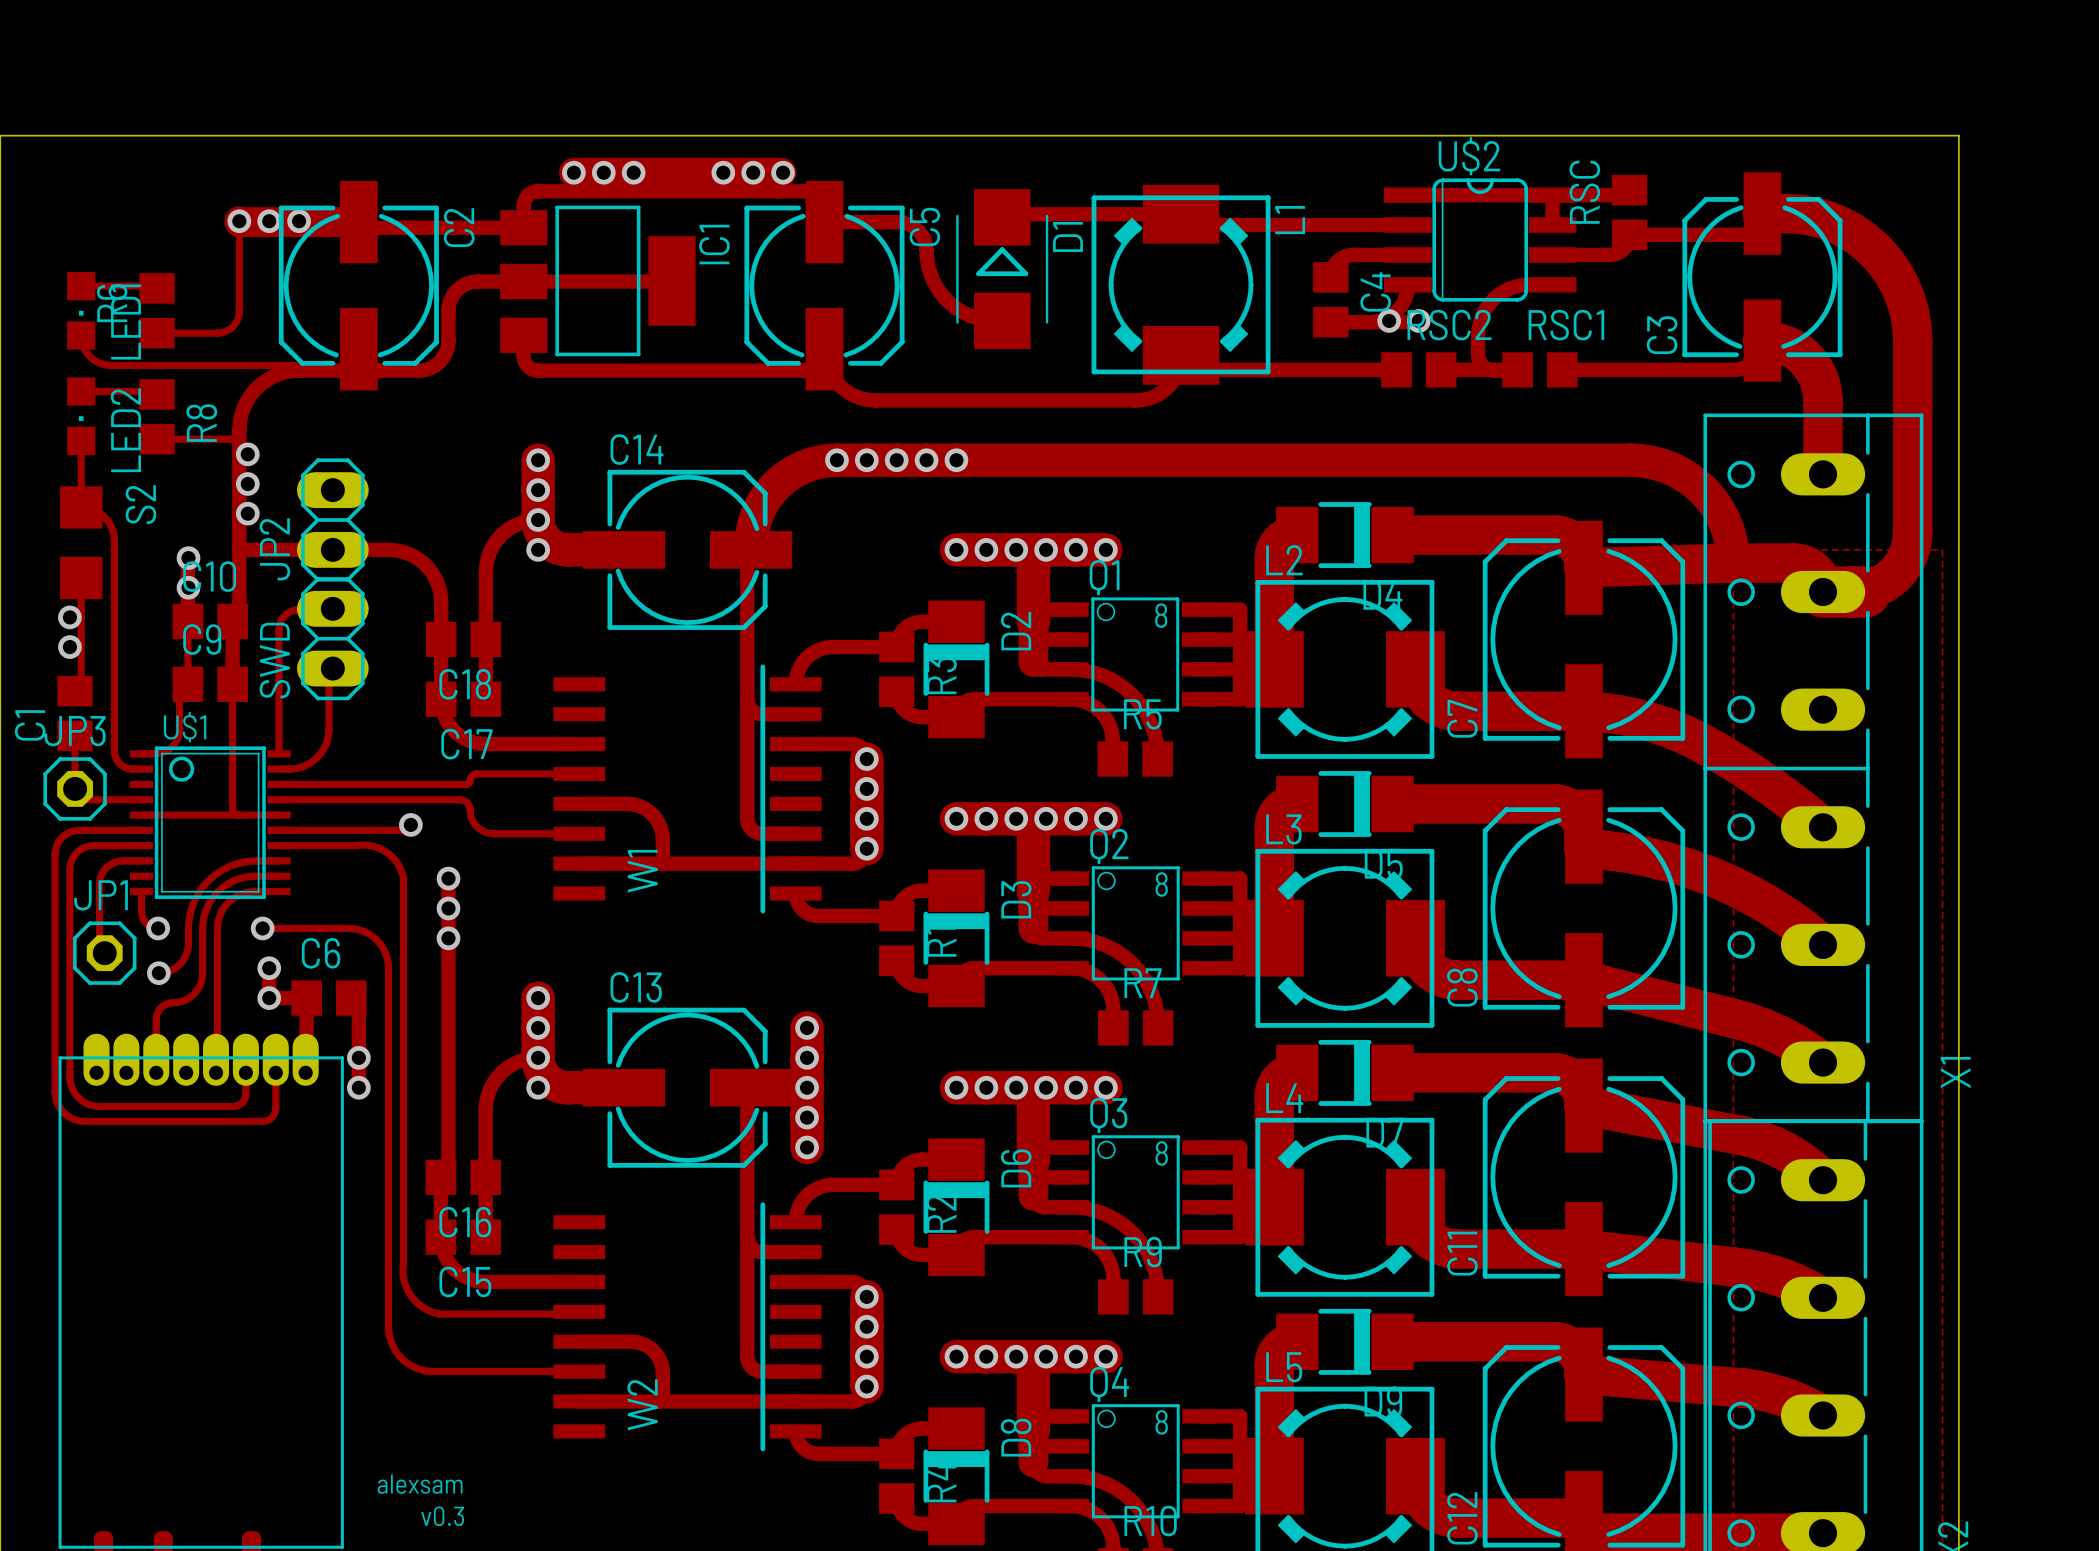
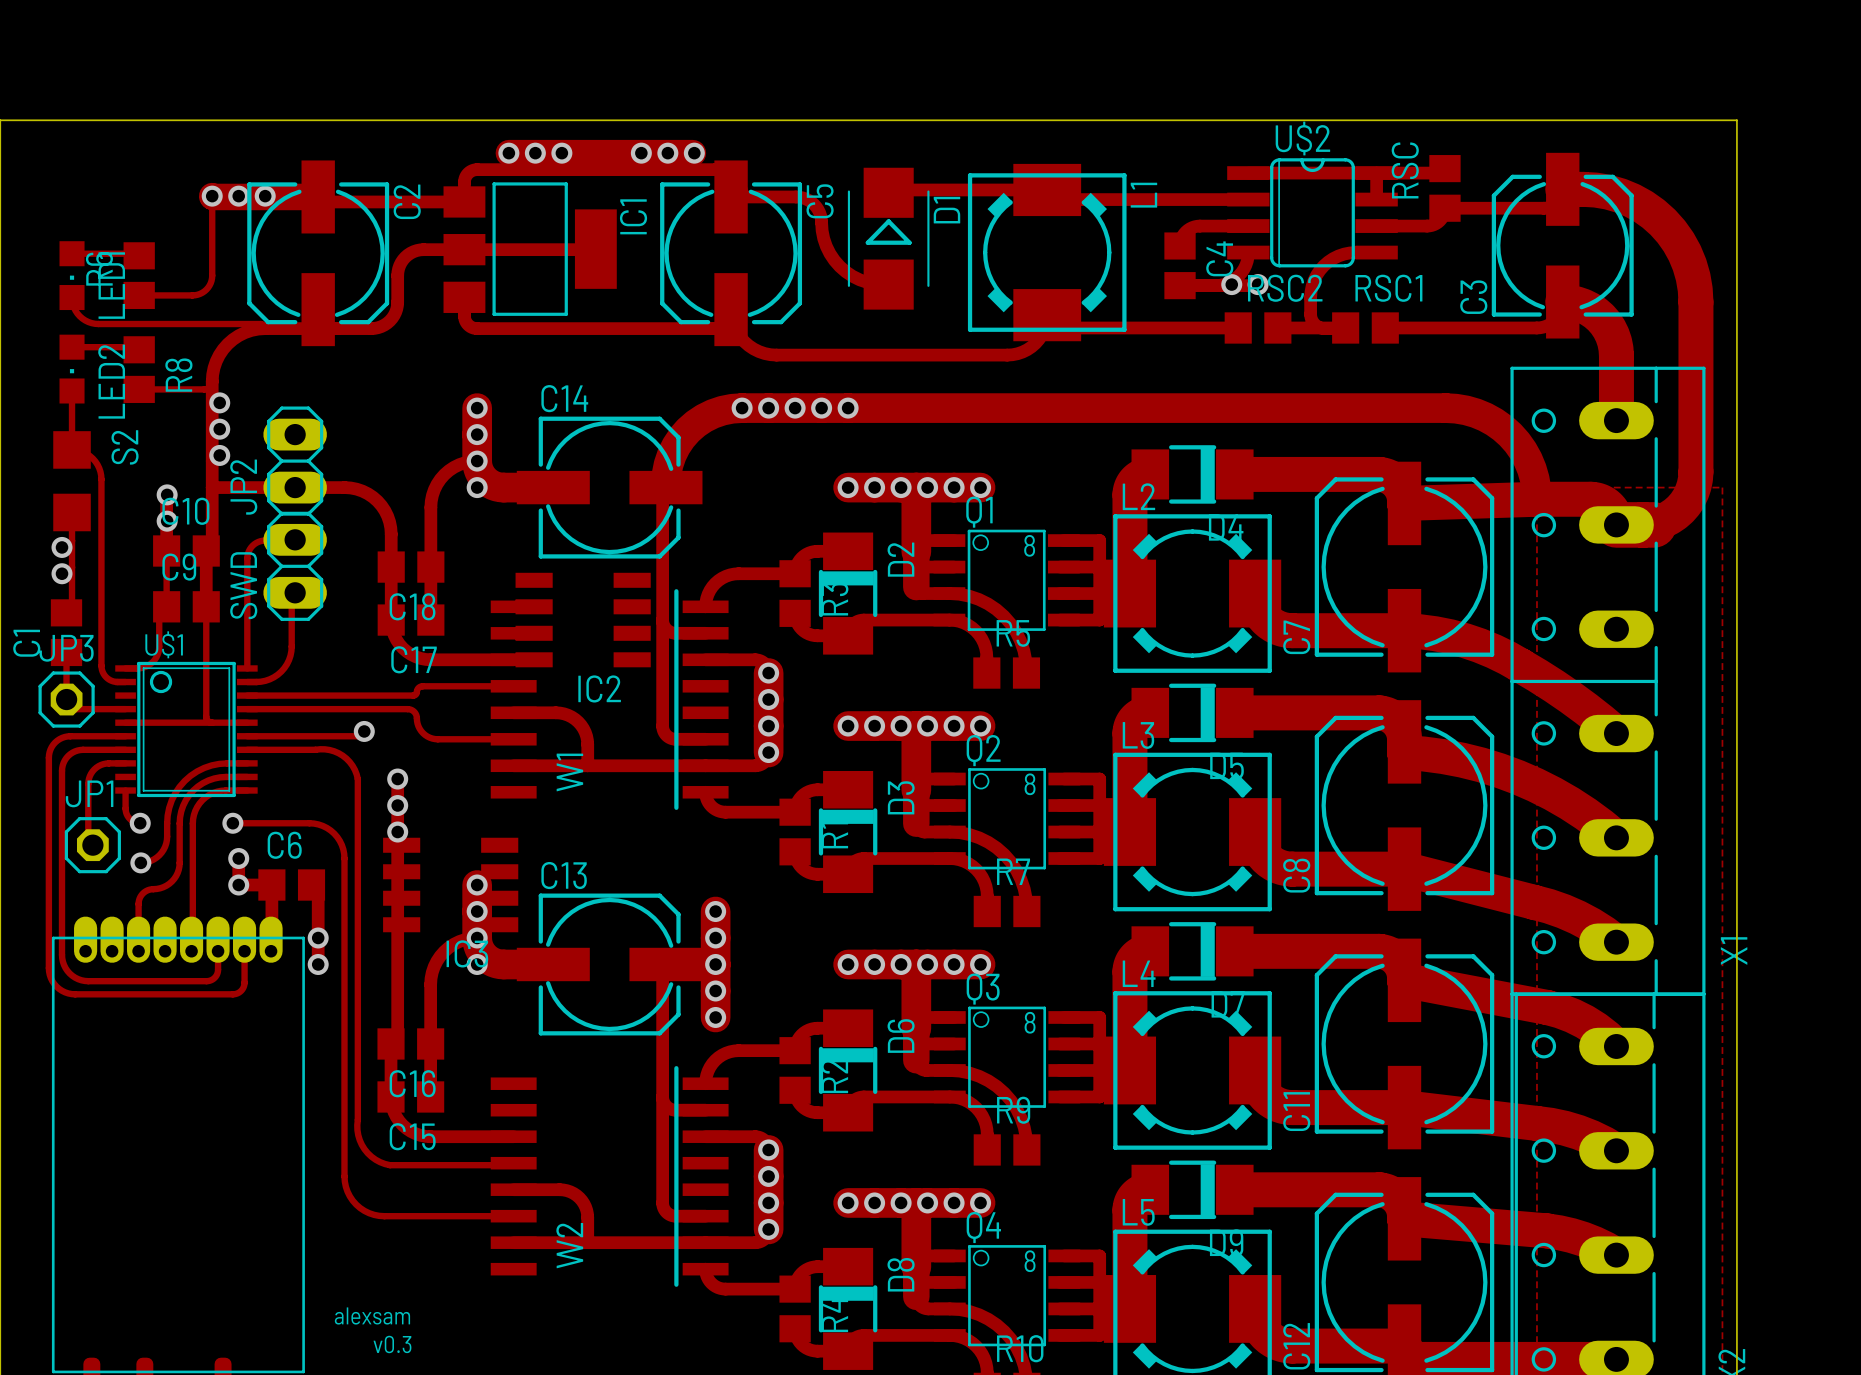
IC2: none -> (583, 620)
IC3: none -> (450, 885)

